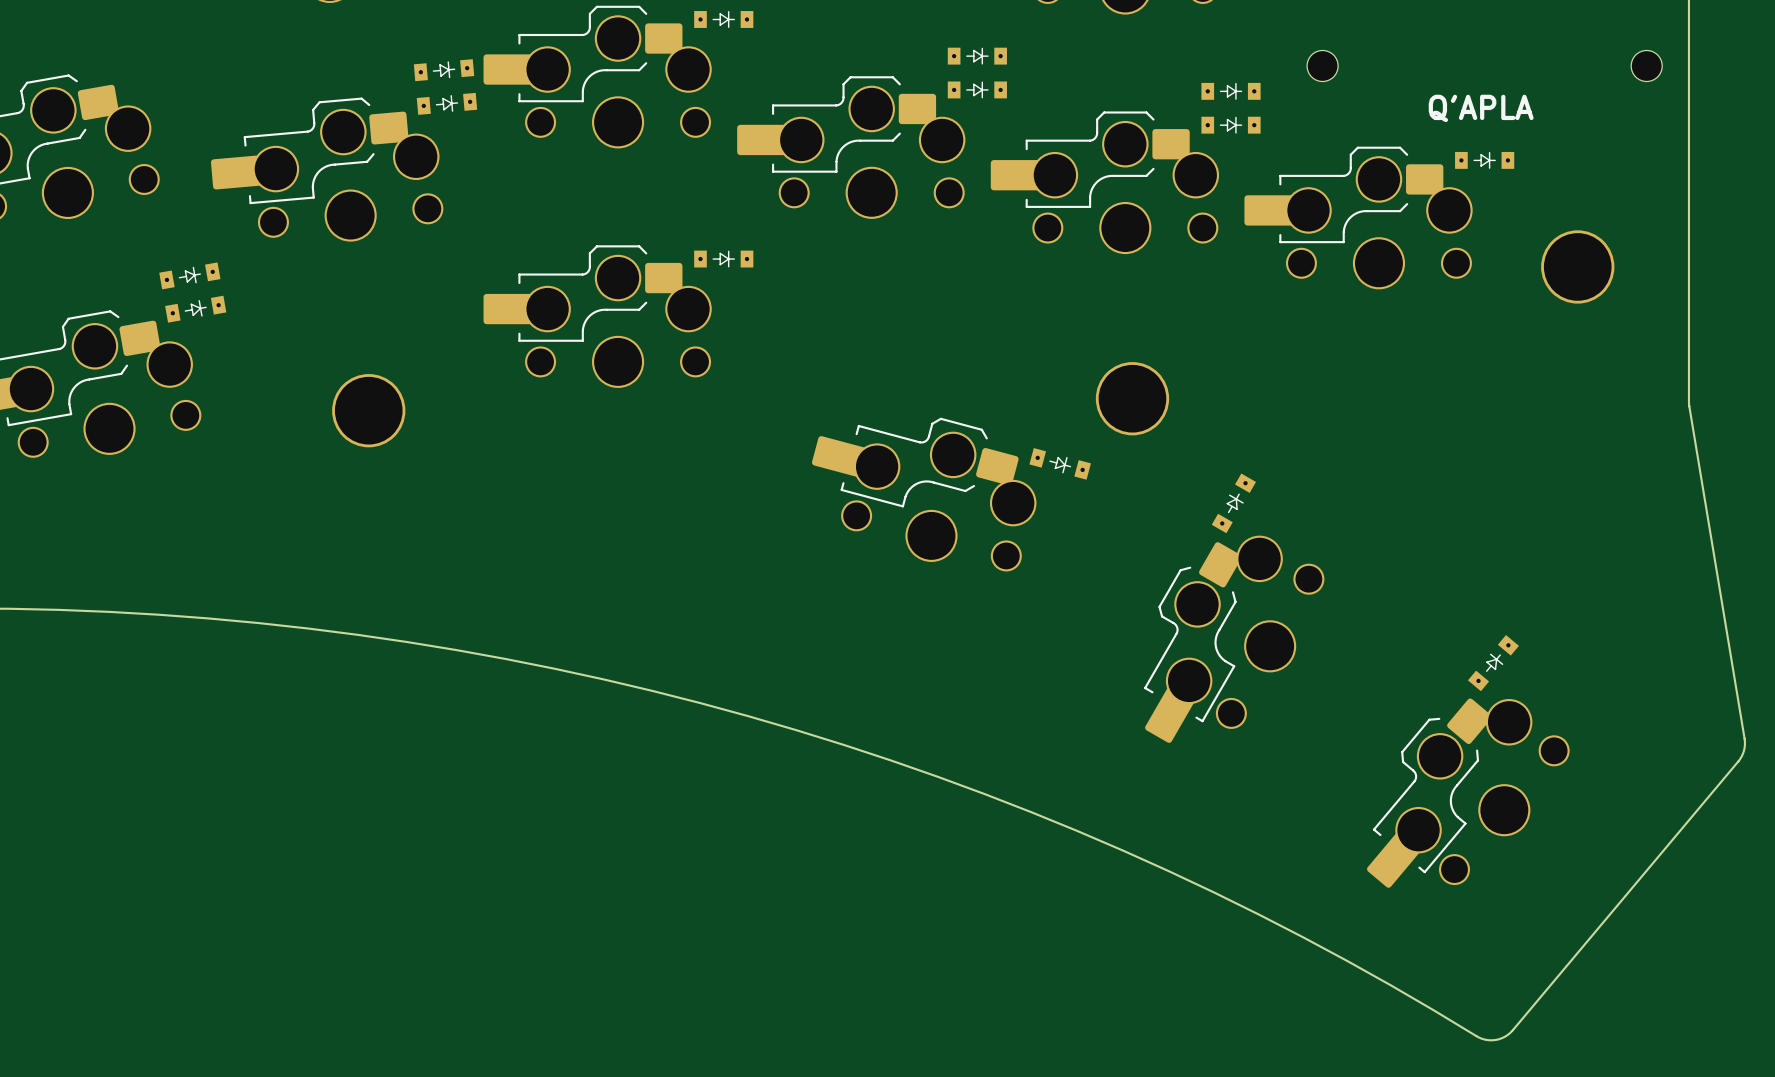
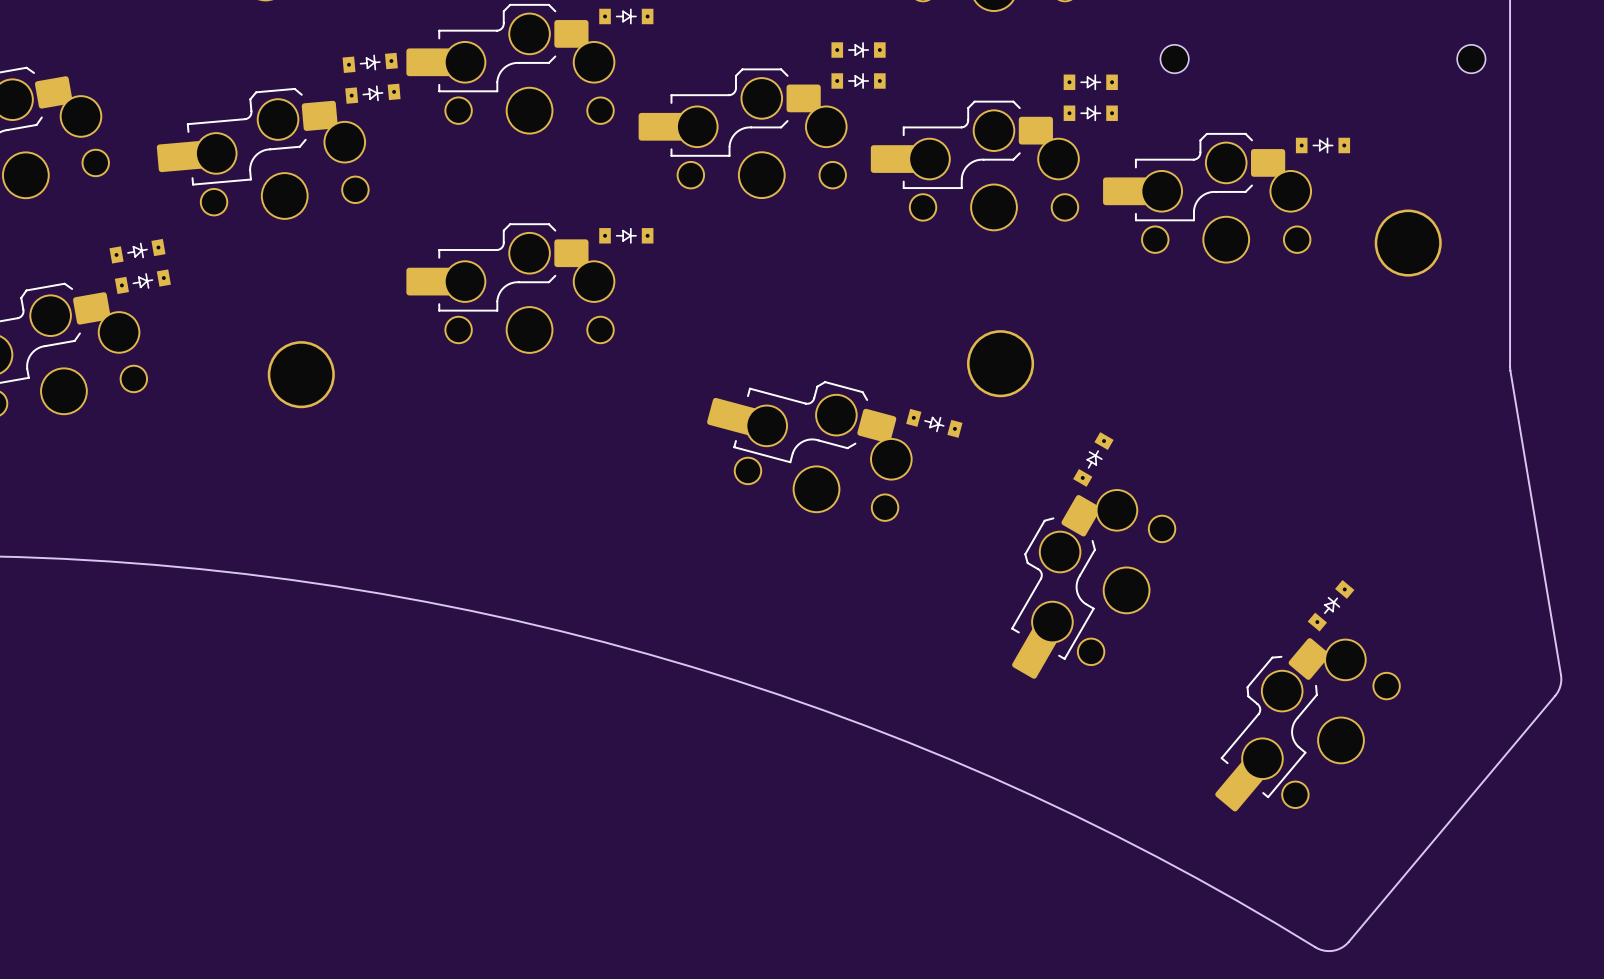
text: Q'APLA (1481, 108) -> none

